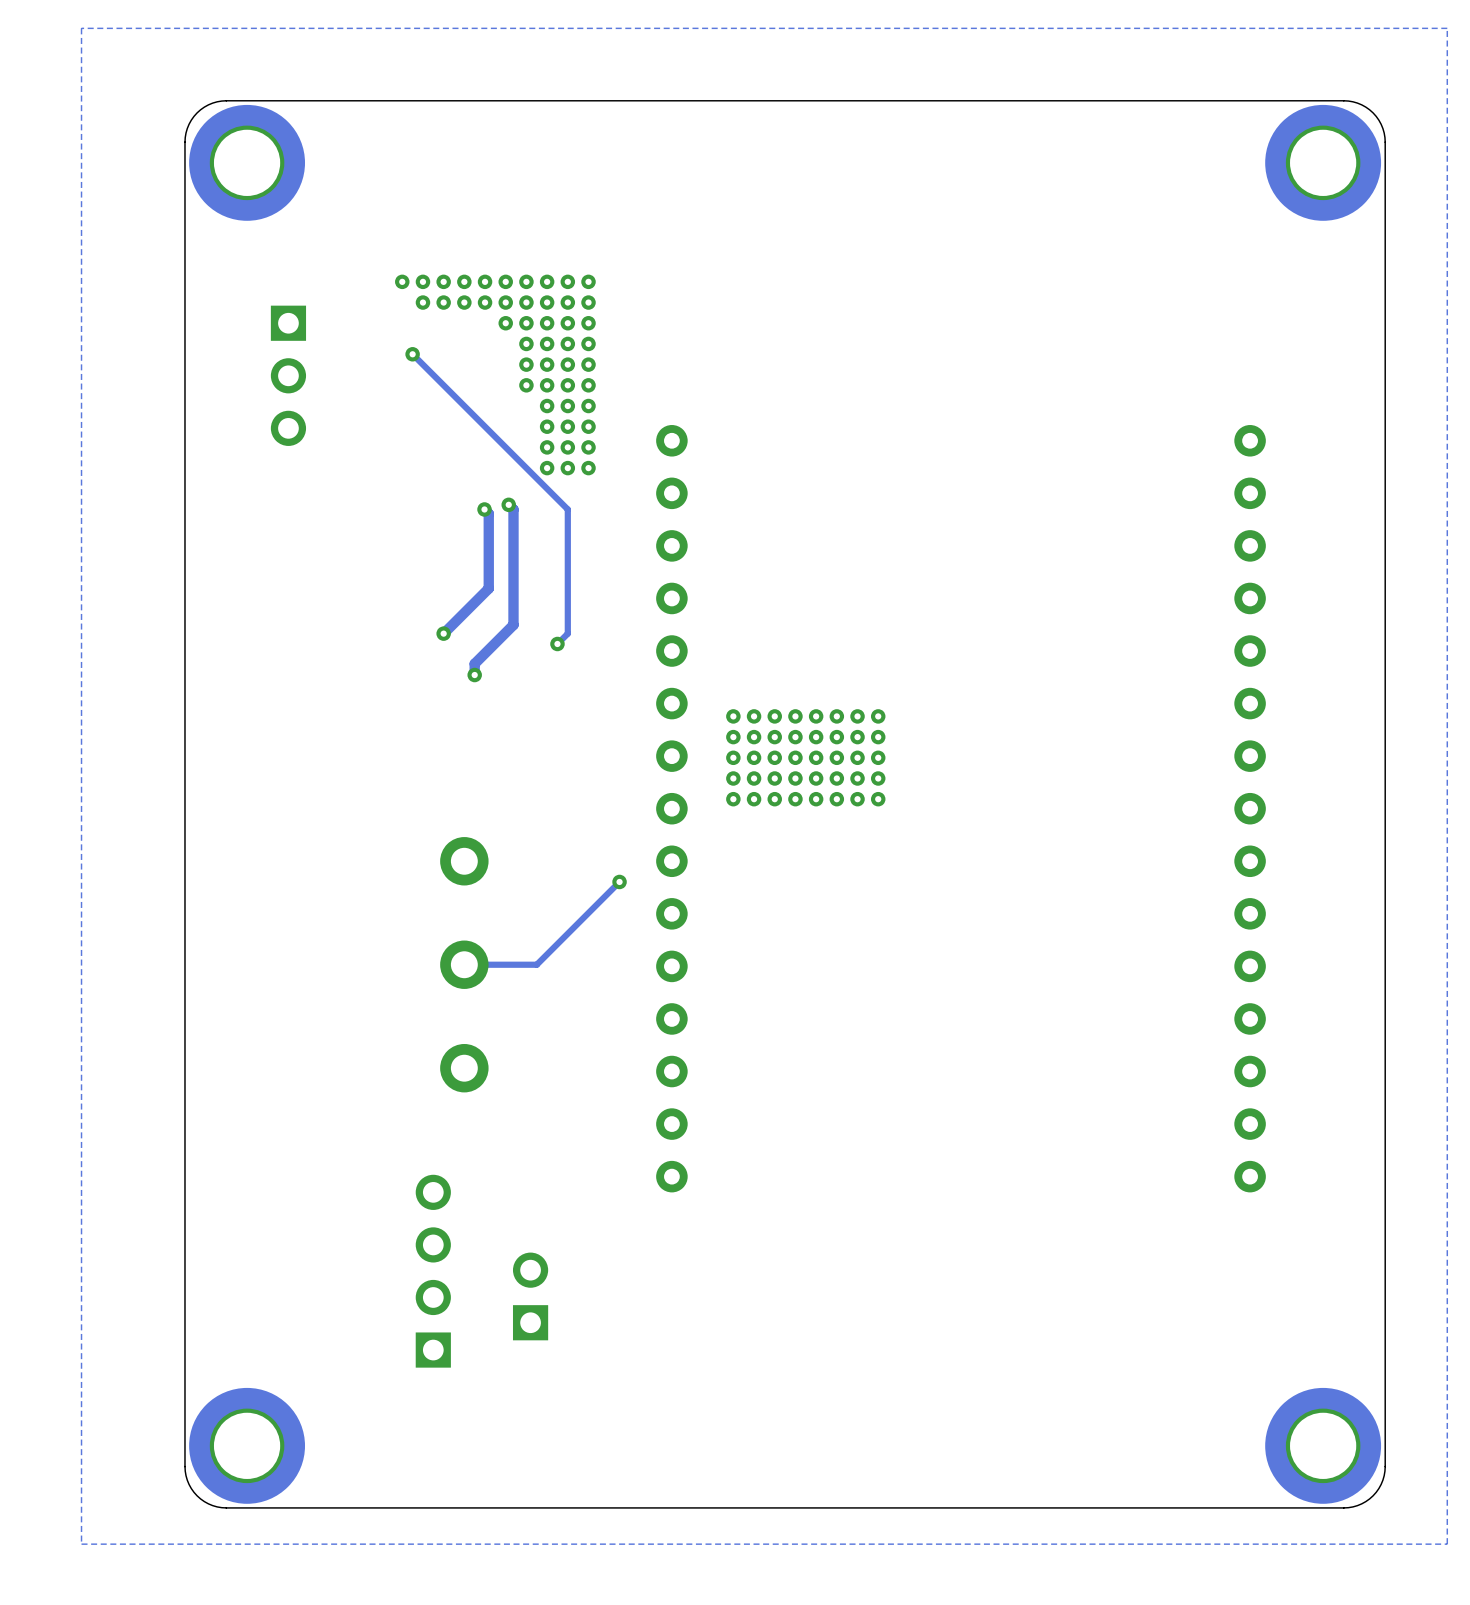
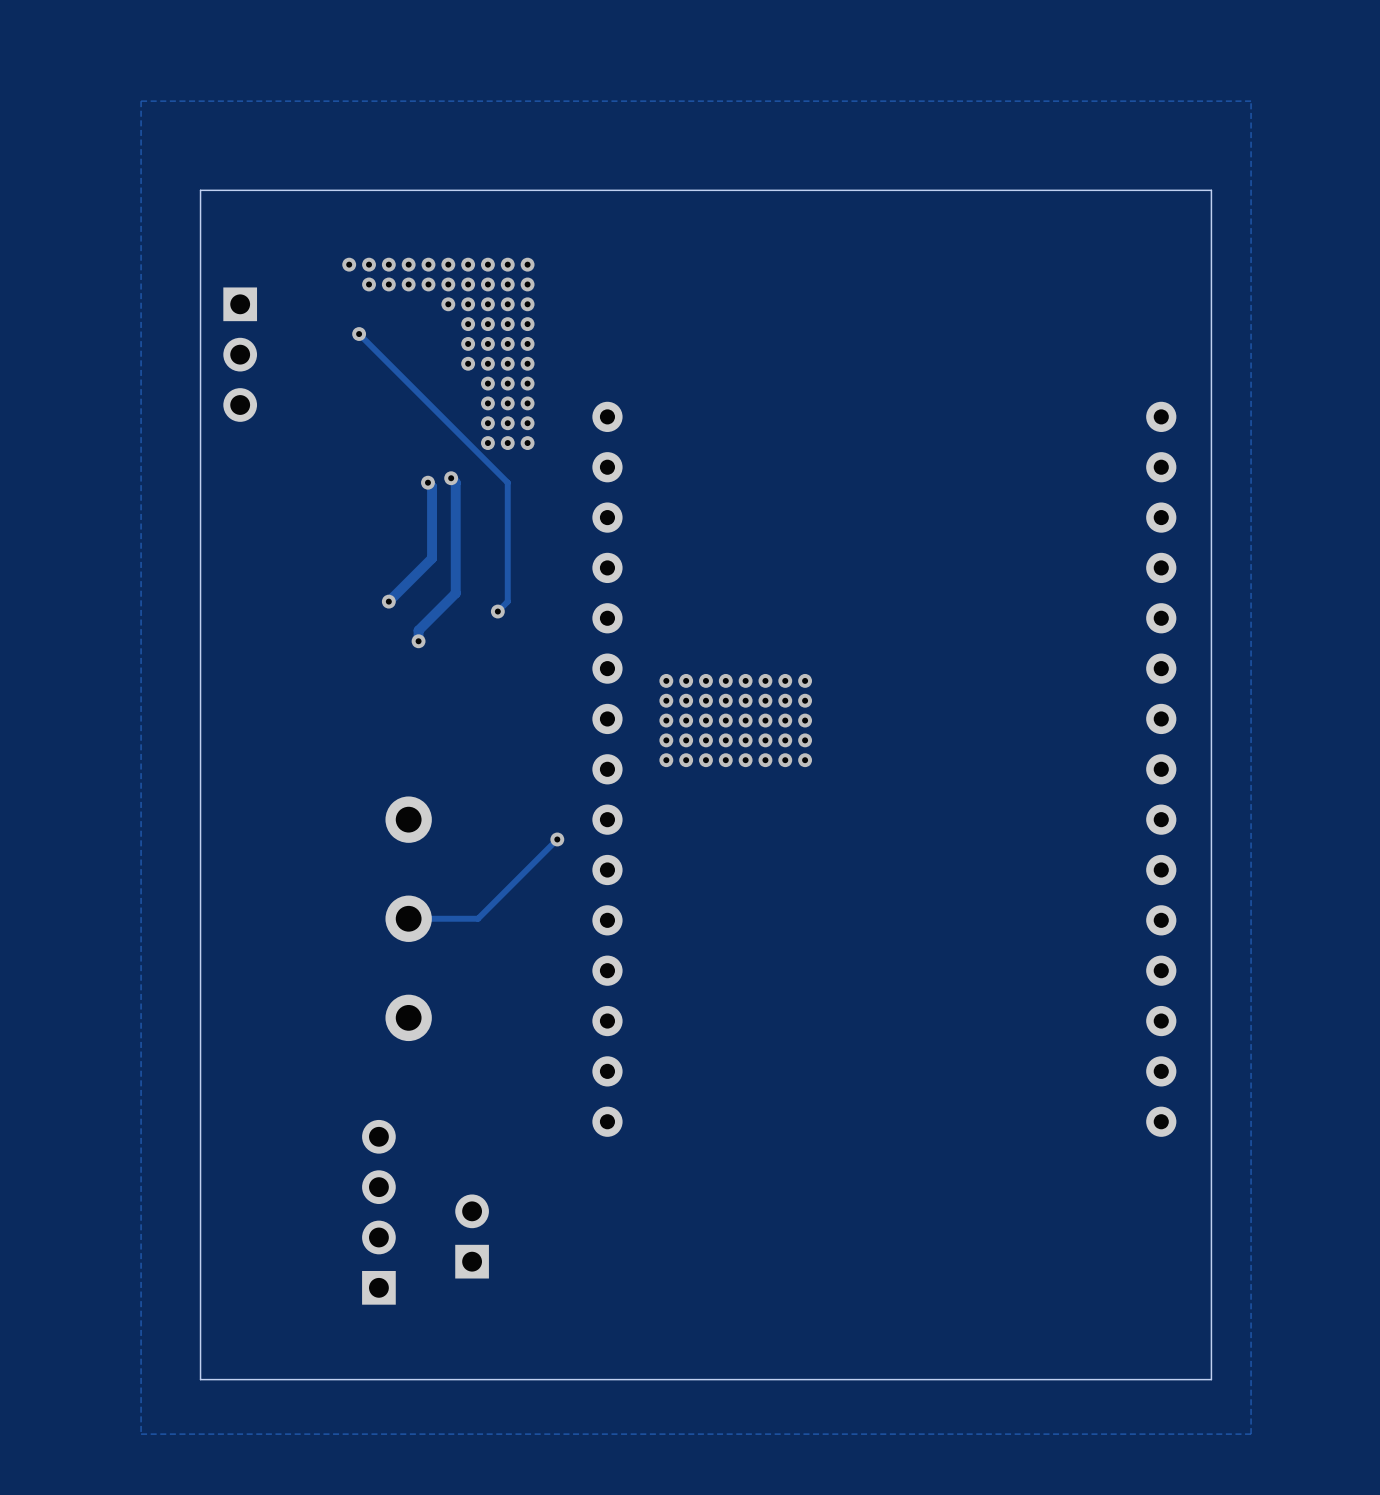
zone outline: (1447, 28) (81, 28) (81, 1544) (1447, 1544) (1447, 28) -> (1251, 101) (1251, 1434) (141, 1434) (141, 101) (1251, 101)
board edge: (1343, 100) (226, 100) (208, 104) (194, 116) (187, 128) (184, 142) (184, 1466) (189, 1484) (200, 1498) (212, 1505) (226, 1507) (1343, 1507) (1361, 1503) (1376, 1492) (1382, 1480) (1385, 1466) (1385, 142) (1382, 128) (1373, 112) (1357, 103) (1343, 100) -> (1211, 190) (1211, 1379) (200, 1379) (200, 190) (1211, 190)
part: (247, 162) -> none
part: (1323, 162) -> none
part: (247, 1445) -> none
part: (1323, 1445) -> none

